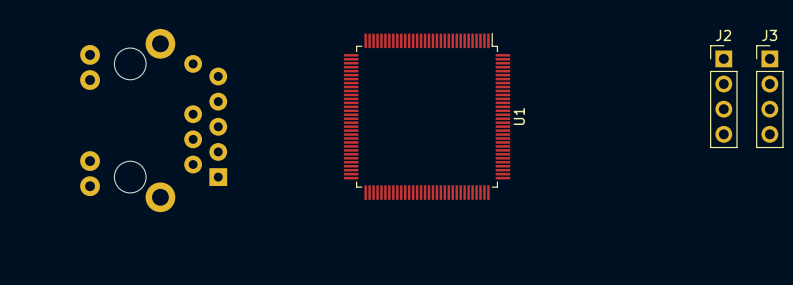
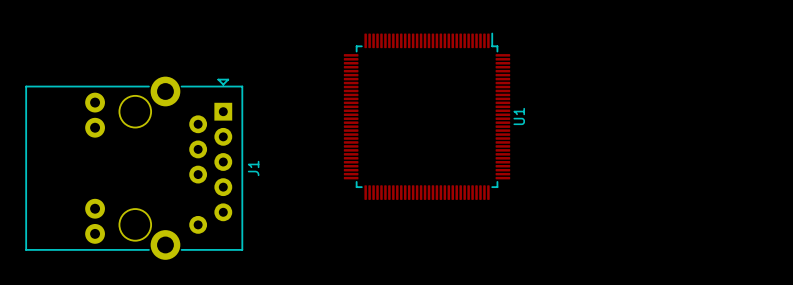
J2: (723, 96) -> none
J3: (769, 96) -> none
J1 side: bottom (153, 120) -> top (134, 168)

